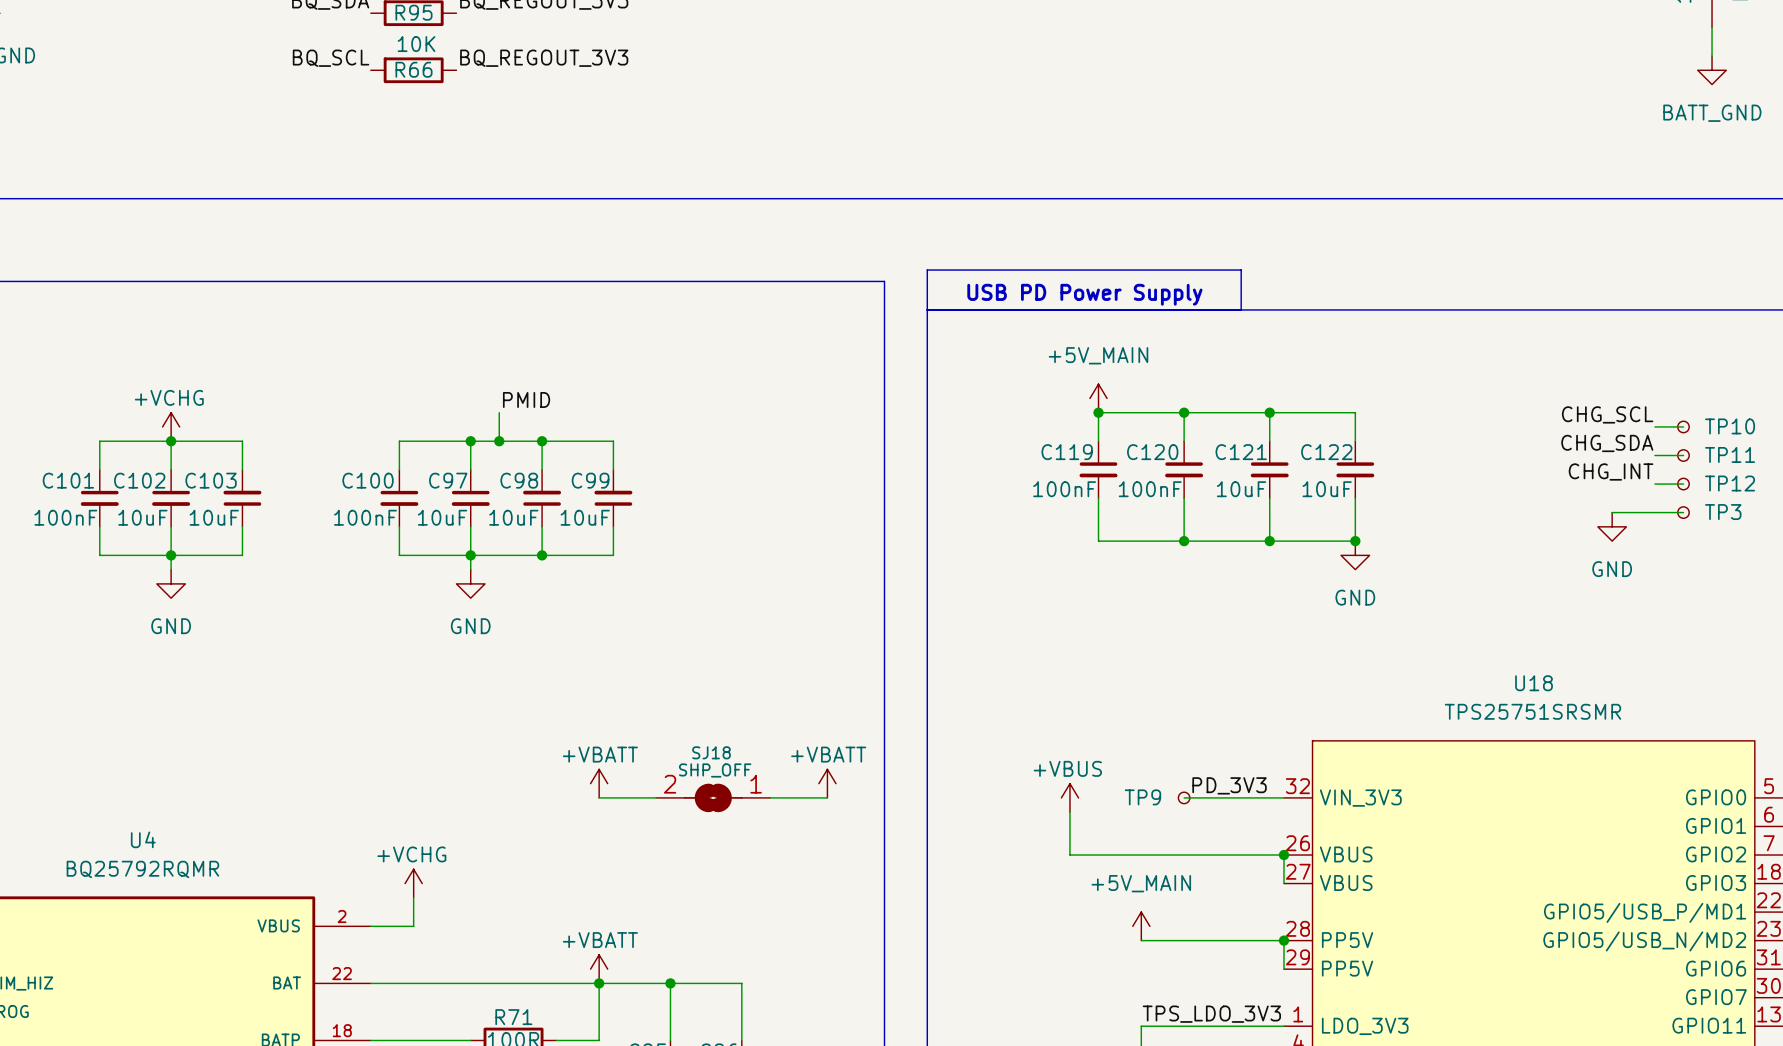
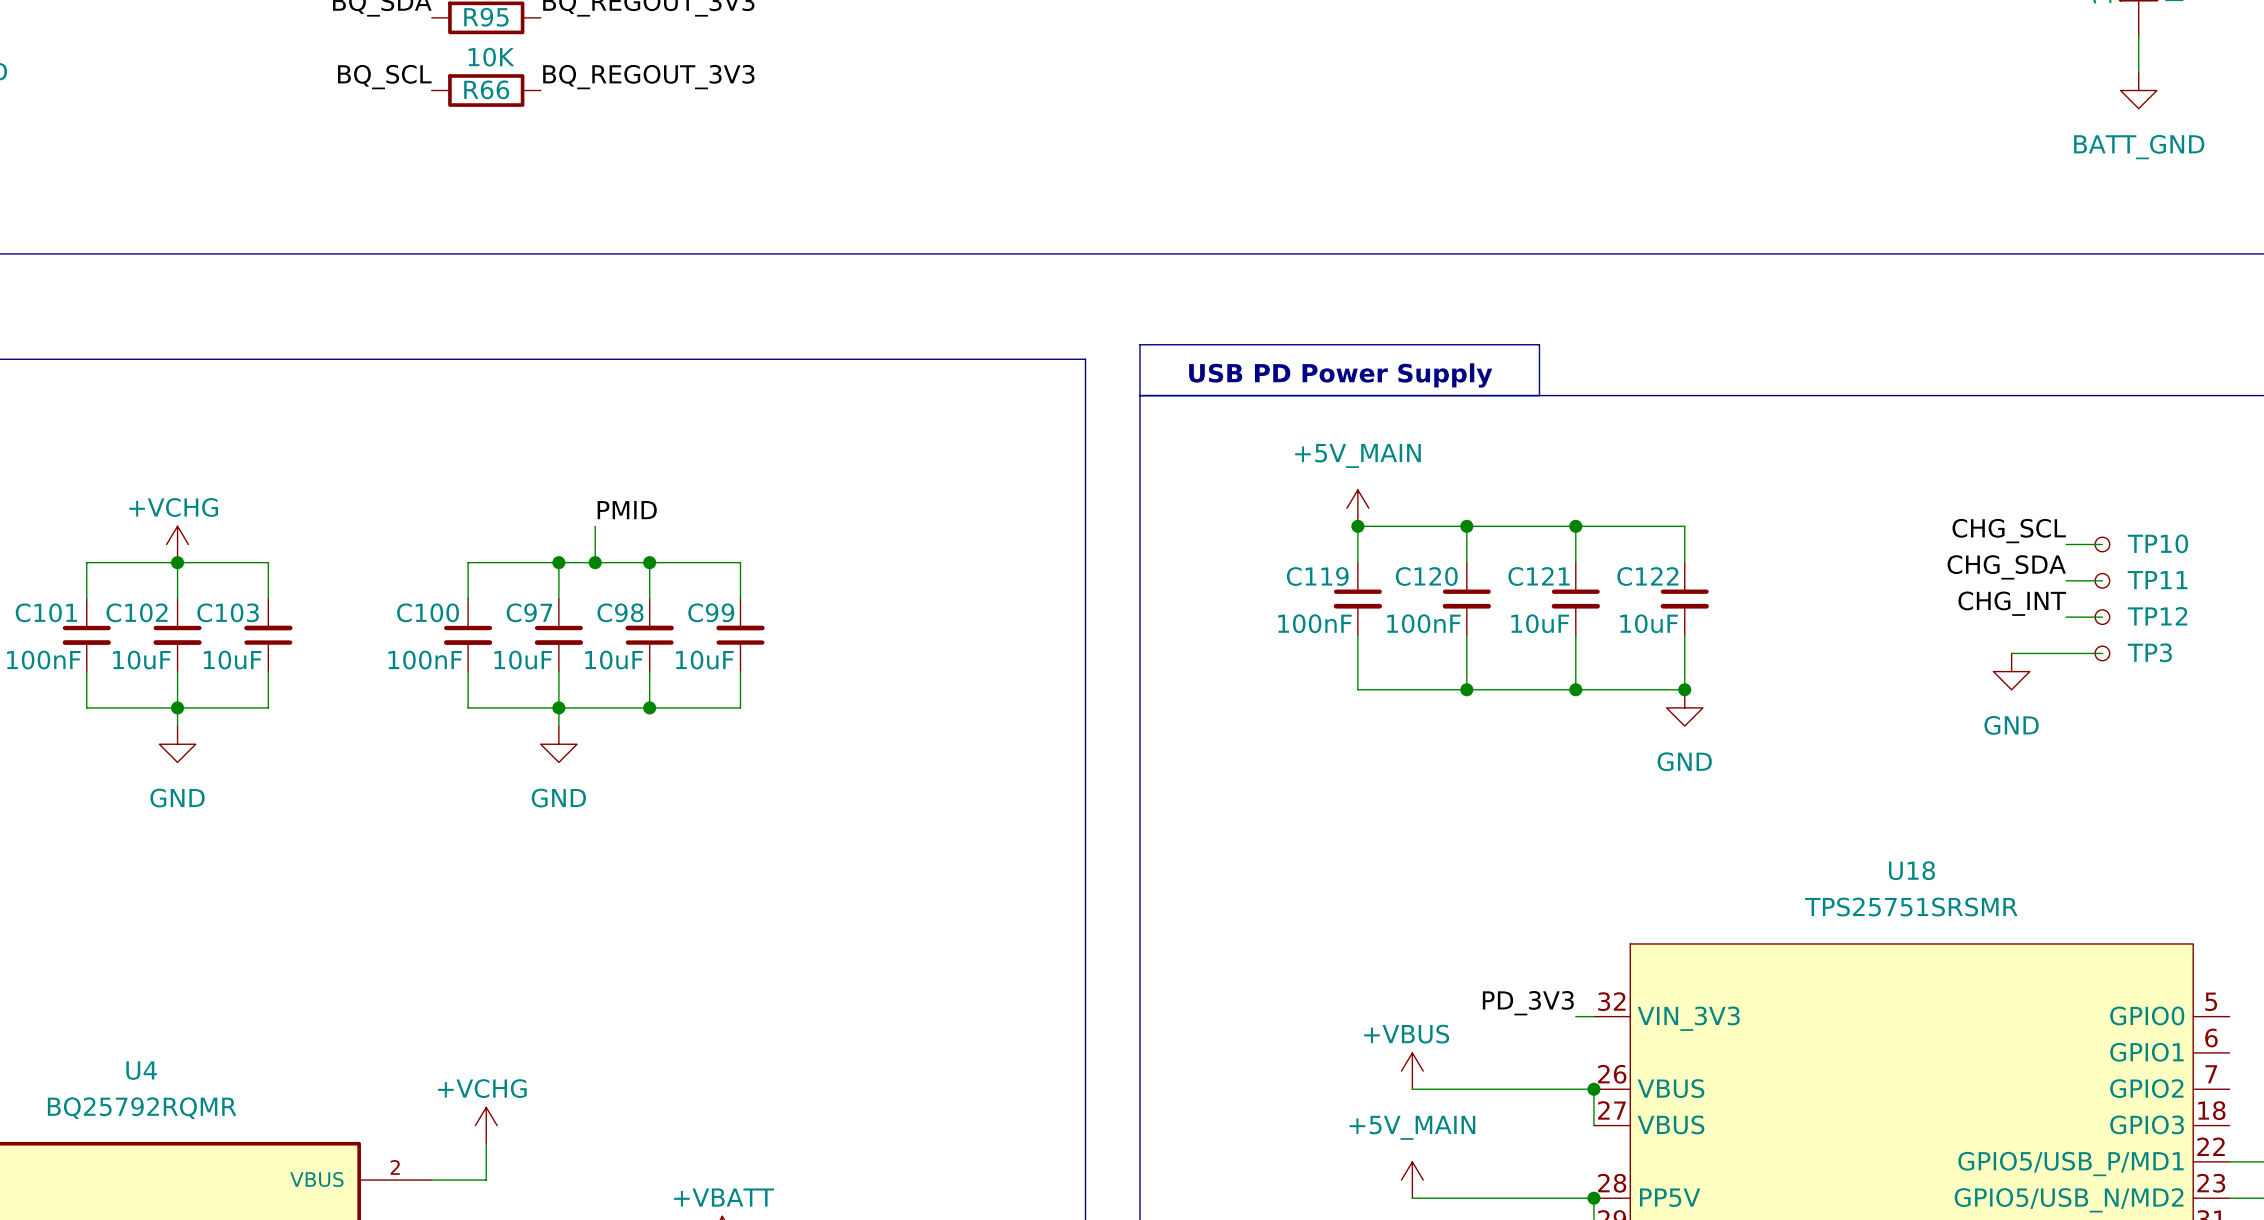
power symbol: +VBATT (599, 783) -> none
power symbol: +VBATT (827, 783) -> none
wire: (599, 797) (656, 797) -> none
SJ18: SHP_OFF (713, 797) -> none
wire: (770, 797) (827, 797) -> none
power symbol position: +VBUS (1069, 797) -> +VBUS (1412, 1071)
wire: (1184, 797) (1269, 797) -> none
TP9: (1184, 797) -> none
wire: (1069, 812) (1069, 855) (1141, 855) -> none

